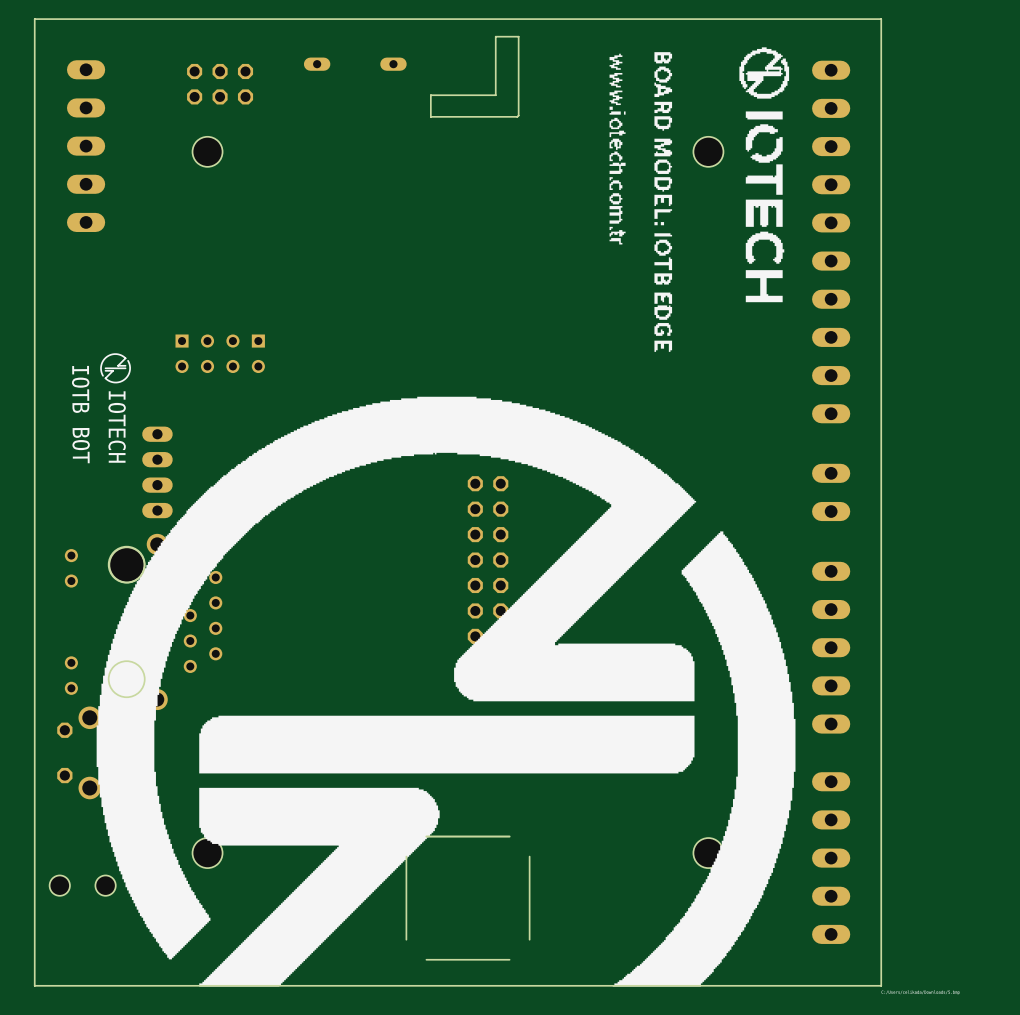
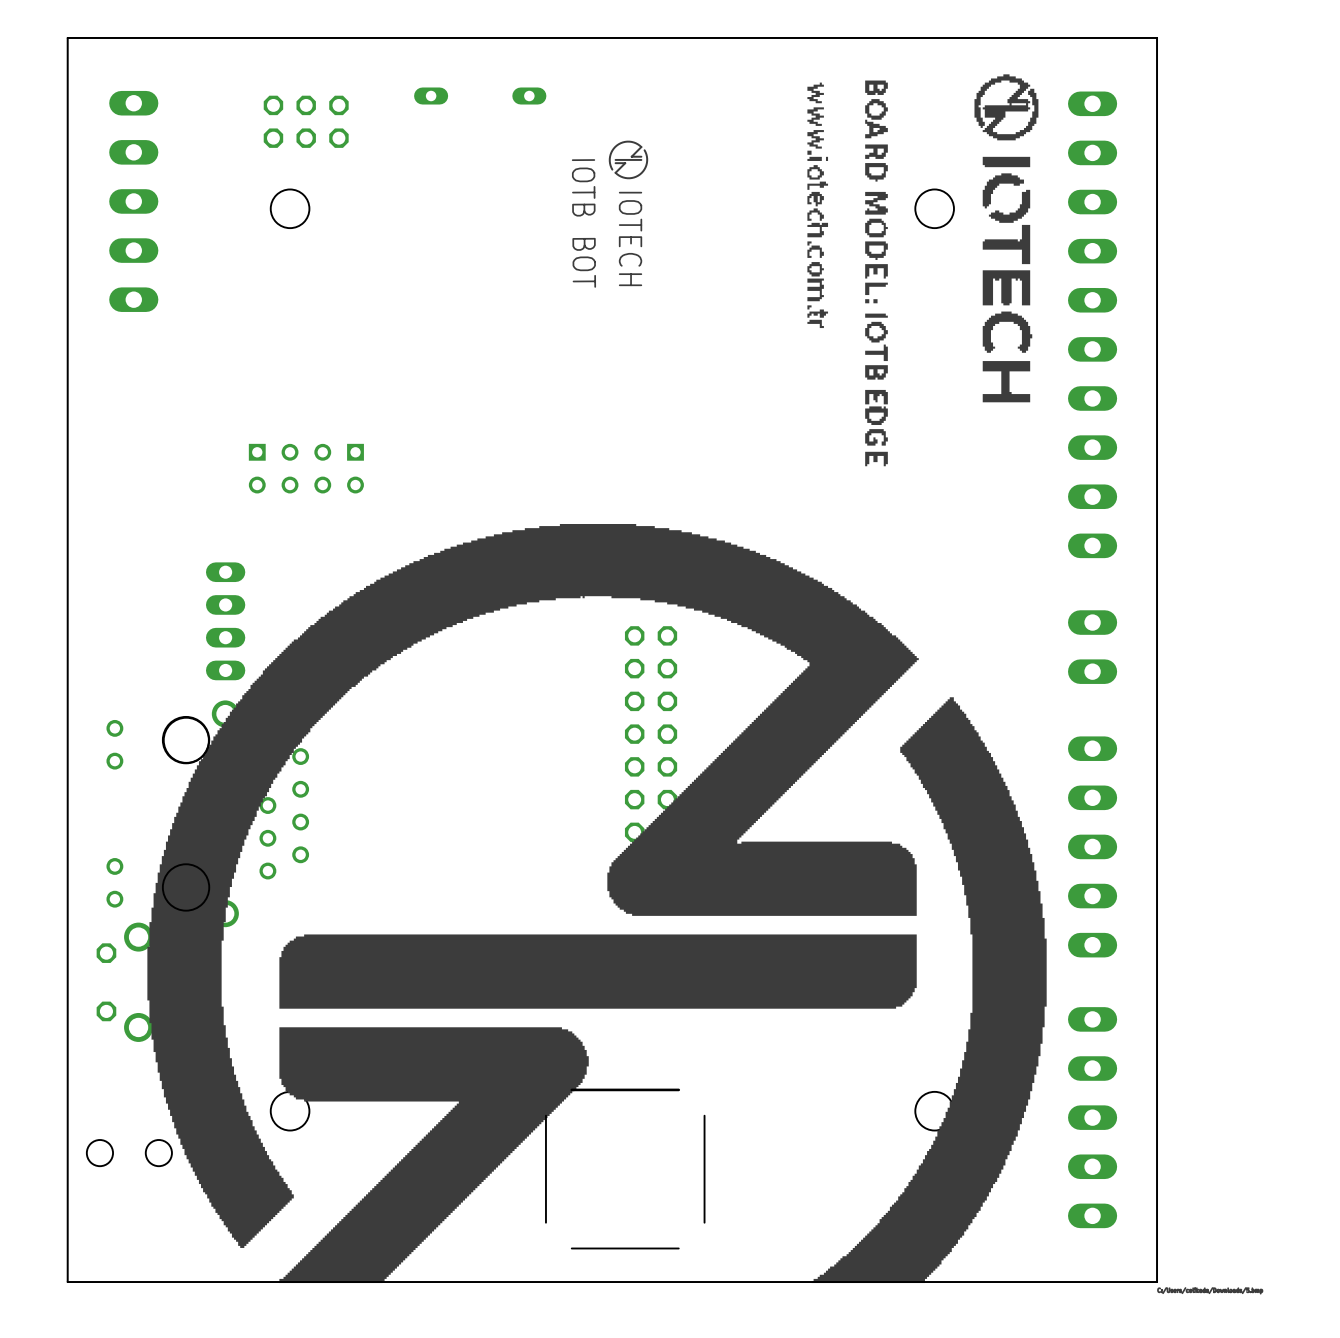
board edge: (518, 36) (495, 36) (495, 95) (430, 95) (430, 116) (517, 116) (518, 36) -> none
line: none -> (644, 150) (646, 156) (646, 165) (643, 171) (636, 176) (627, 178) (619, 175) (615, 172) (625, 163) (615, 163)
line: none -> (641, 156) (631, 156) (641, 147) (637, 144) (629, 141) (620, 143) (613, 148) (610, 154) (610, 163) (612, 169)
line: none -> (641, 159) (615, 159)
text: none -> IOTB BOT (583, 223)
text: none -> IOTECH (630, 238)
line: (128, 360) (129, 372) (121, 381) (114, 382) (108, 380) (105, 378) (113, 370) (105, 370) -> none
line: (125, 365) (118, 365) (125, 358) (122, 356) (116, 354) (109, 355) (101, 364) (103, 375) -> none
line: (125, 368) (105, 368) -> none
text: IOTB BOT (80, 414) -> none
text: IOTECH (117, 427) -> none

